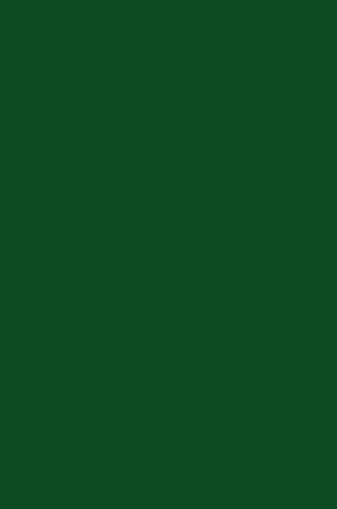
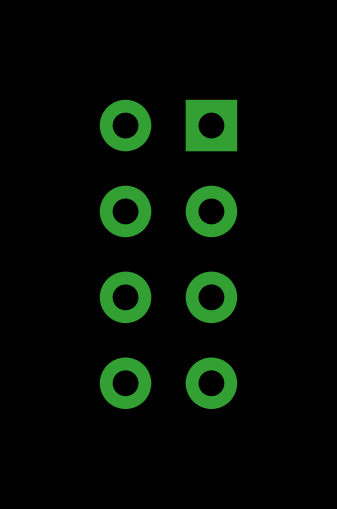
part: none -> (168, 254)

